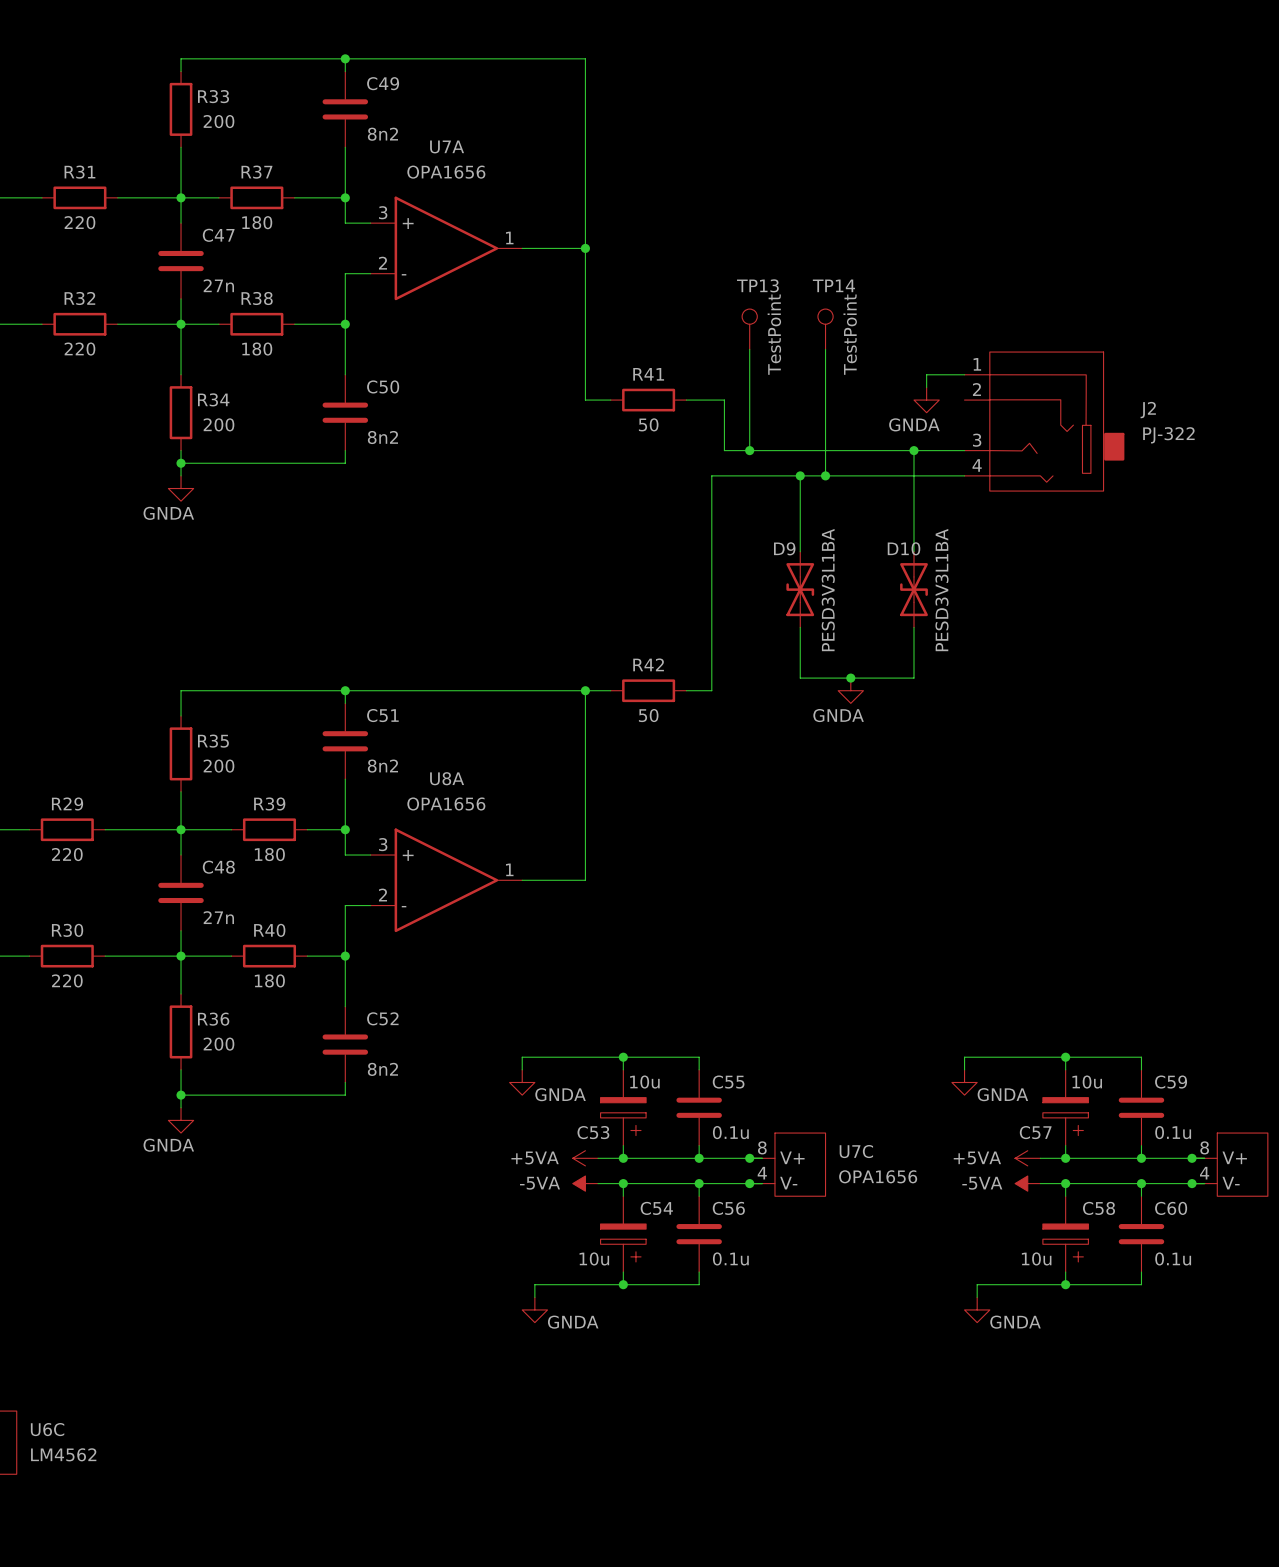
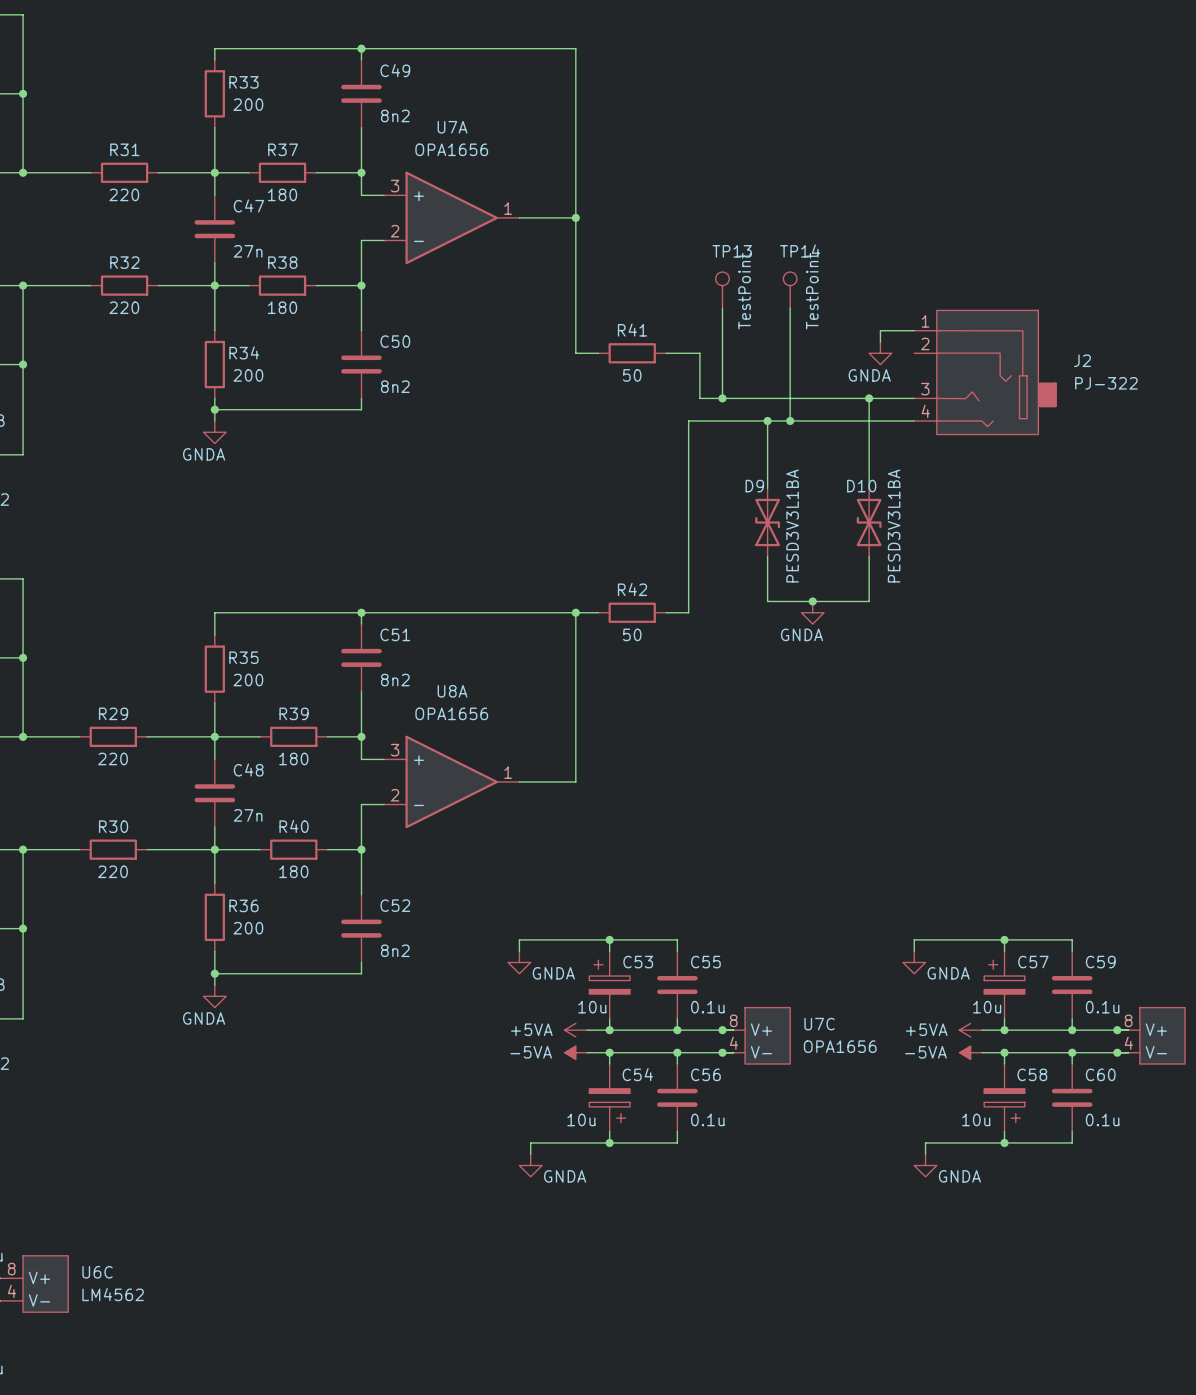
C53 rotation: 0° (623, 1116) -> 180° (609, 977)
C57 rotation: 0° (1065, 1116) -> 180° (1004, 977)

